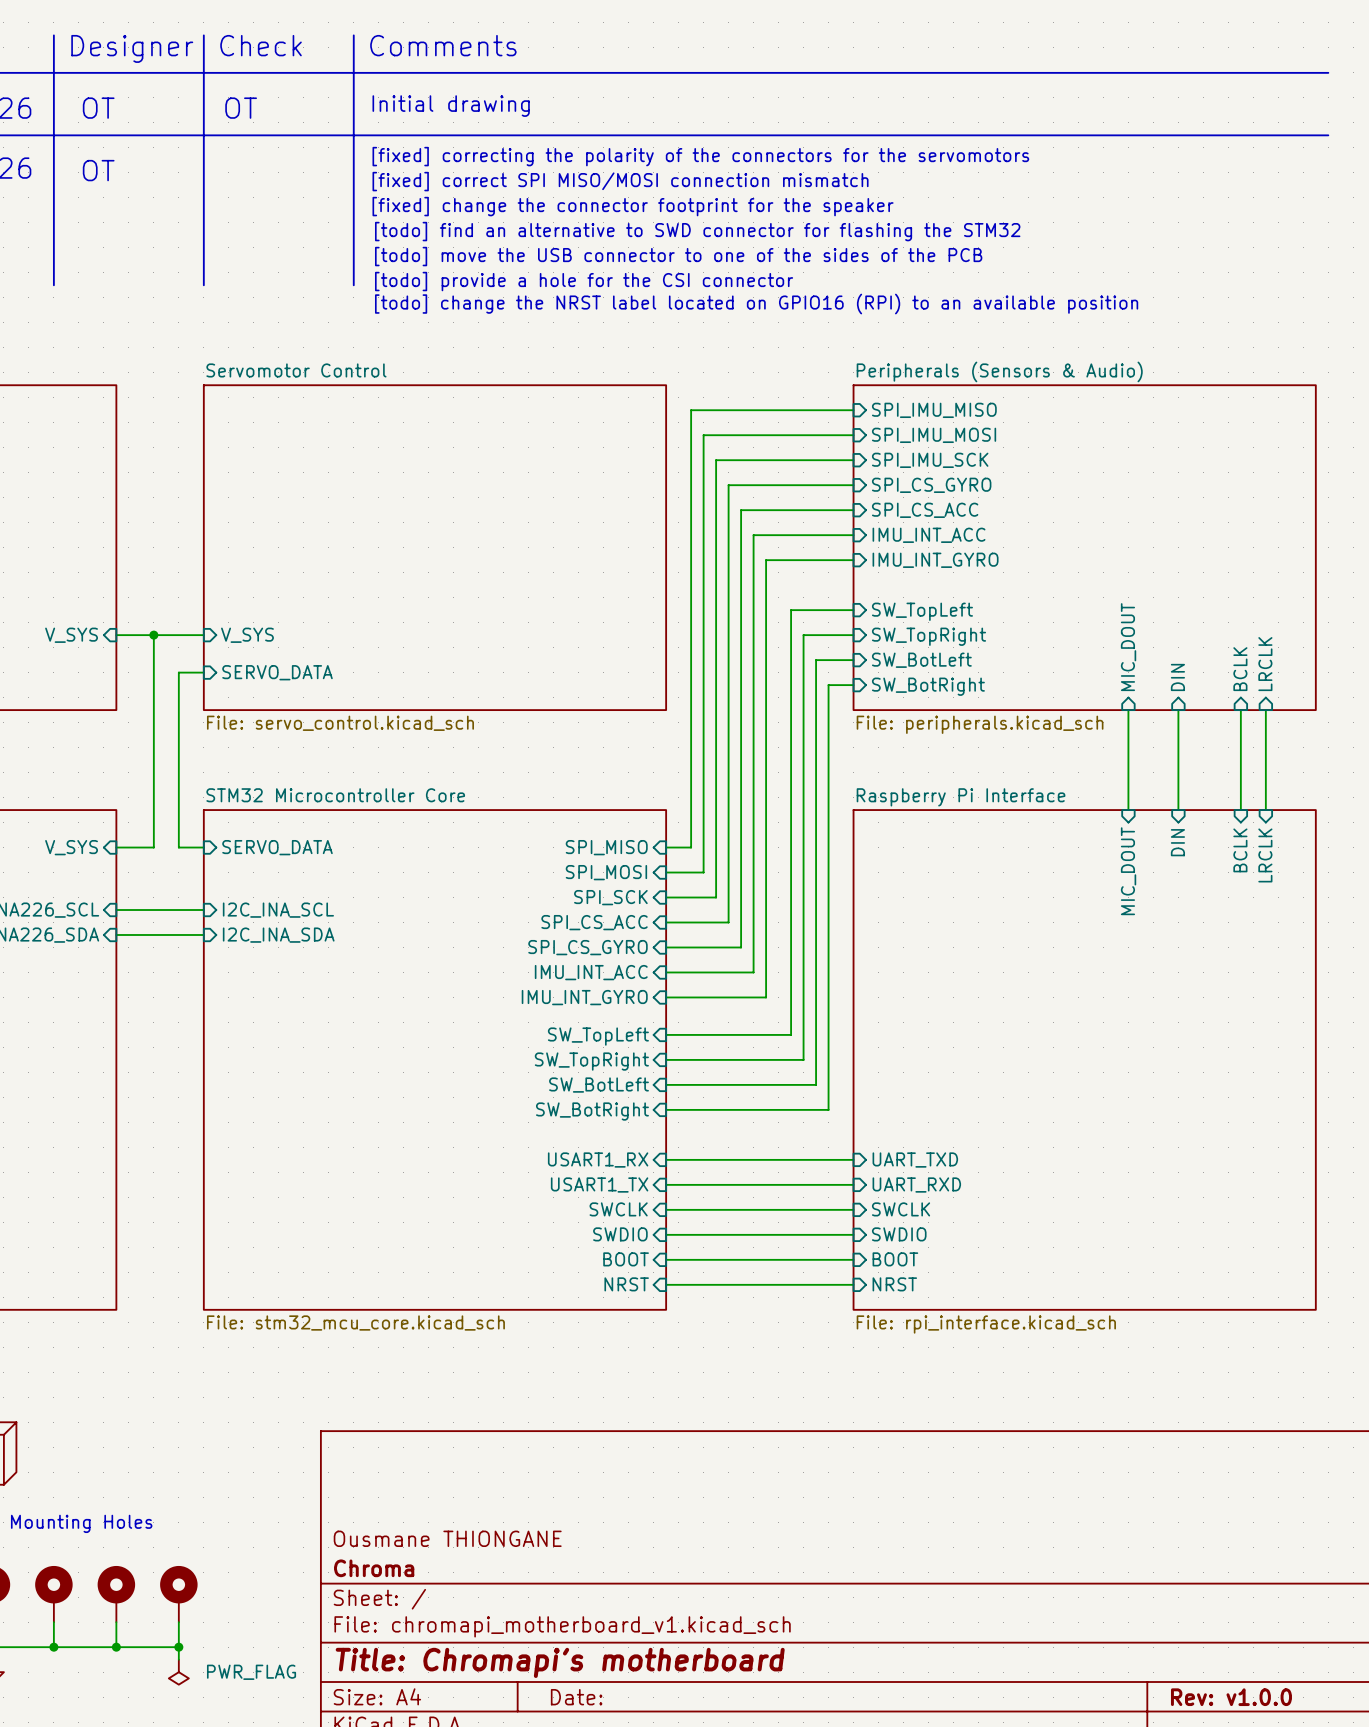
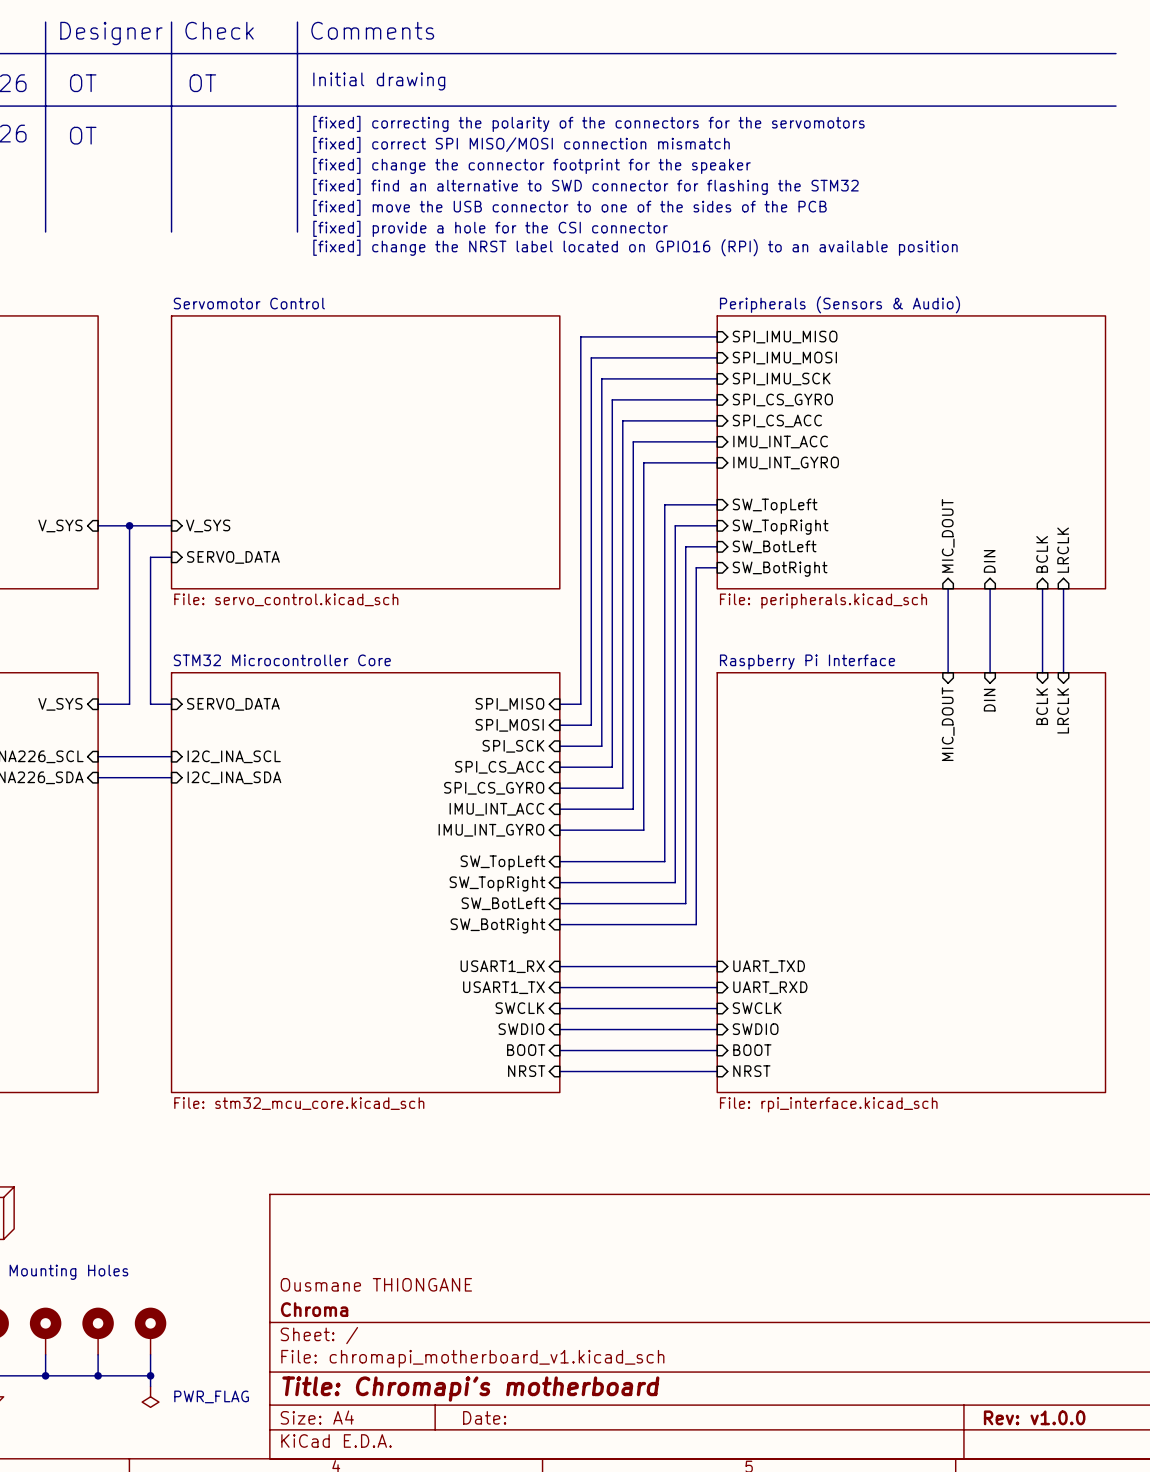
text: [todo] find an alternative to SWD connector for flashing the STM32 (697, 231) -> [fixed] find an alternative to SWD connector for flashing the STM32 (585, 186)
text: [todo] move the USB connector to one of the sides of the PCB (678, 256) -> [fixed] move the USB connector to one of the sides of the PCB (569, 207)
text: [todo] provide a hole for the CSI connector (584, 281) -> [fixed] provide a hole for the CSI connector (490, 228)
text: [todo] change the NRST label located on GPIO16 (RPI) to an available position (756, 304) -> [fixed] change the NRST label located on GPIO16 (RPI) to an available position (635, 247)

